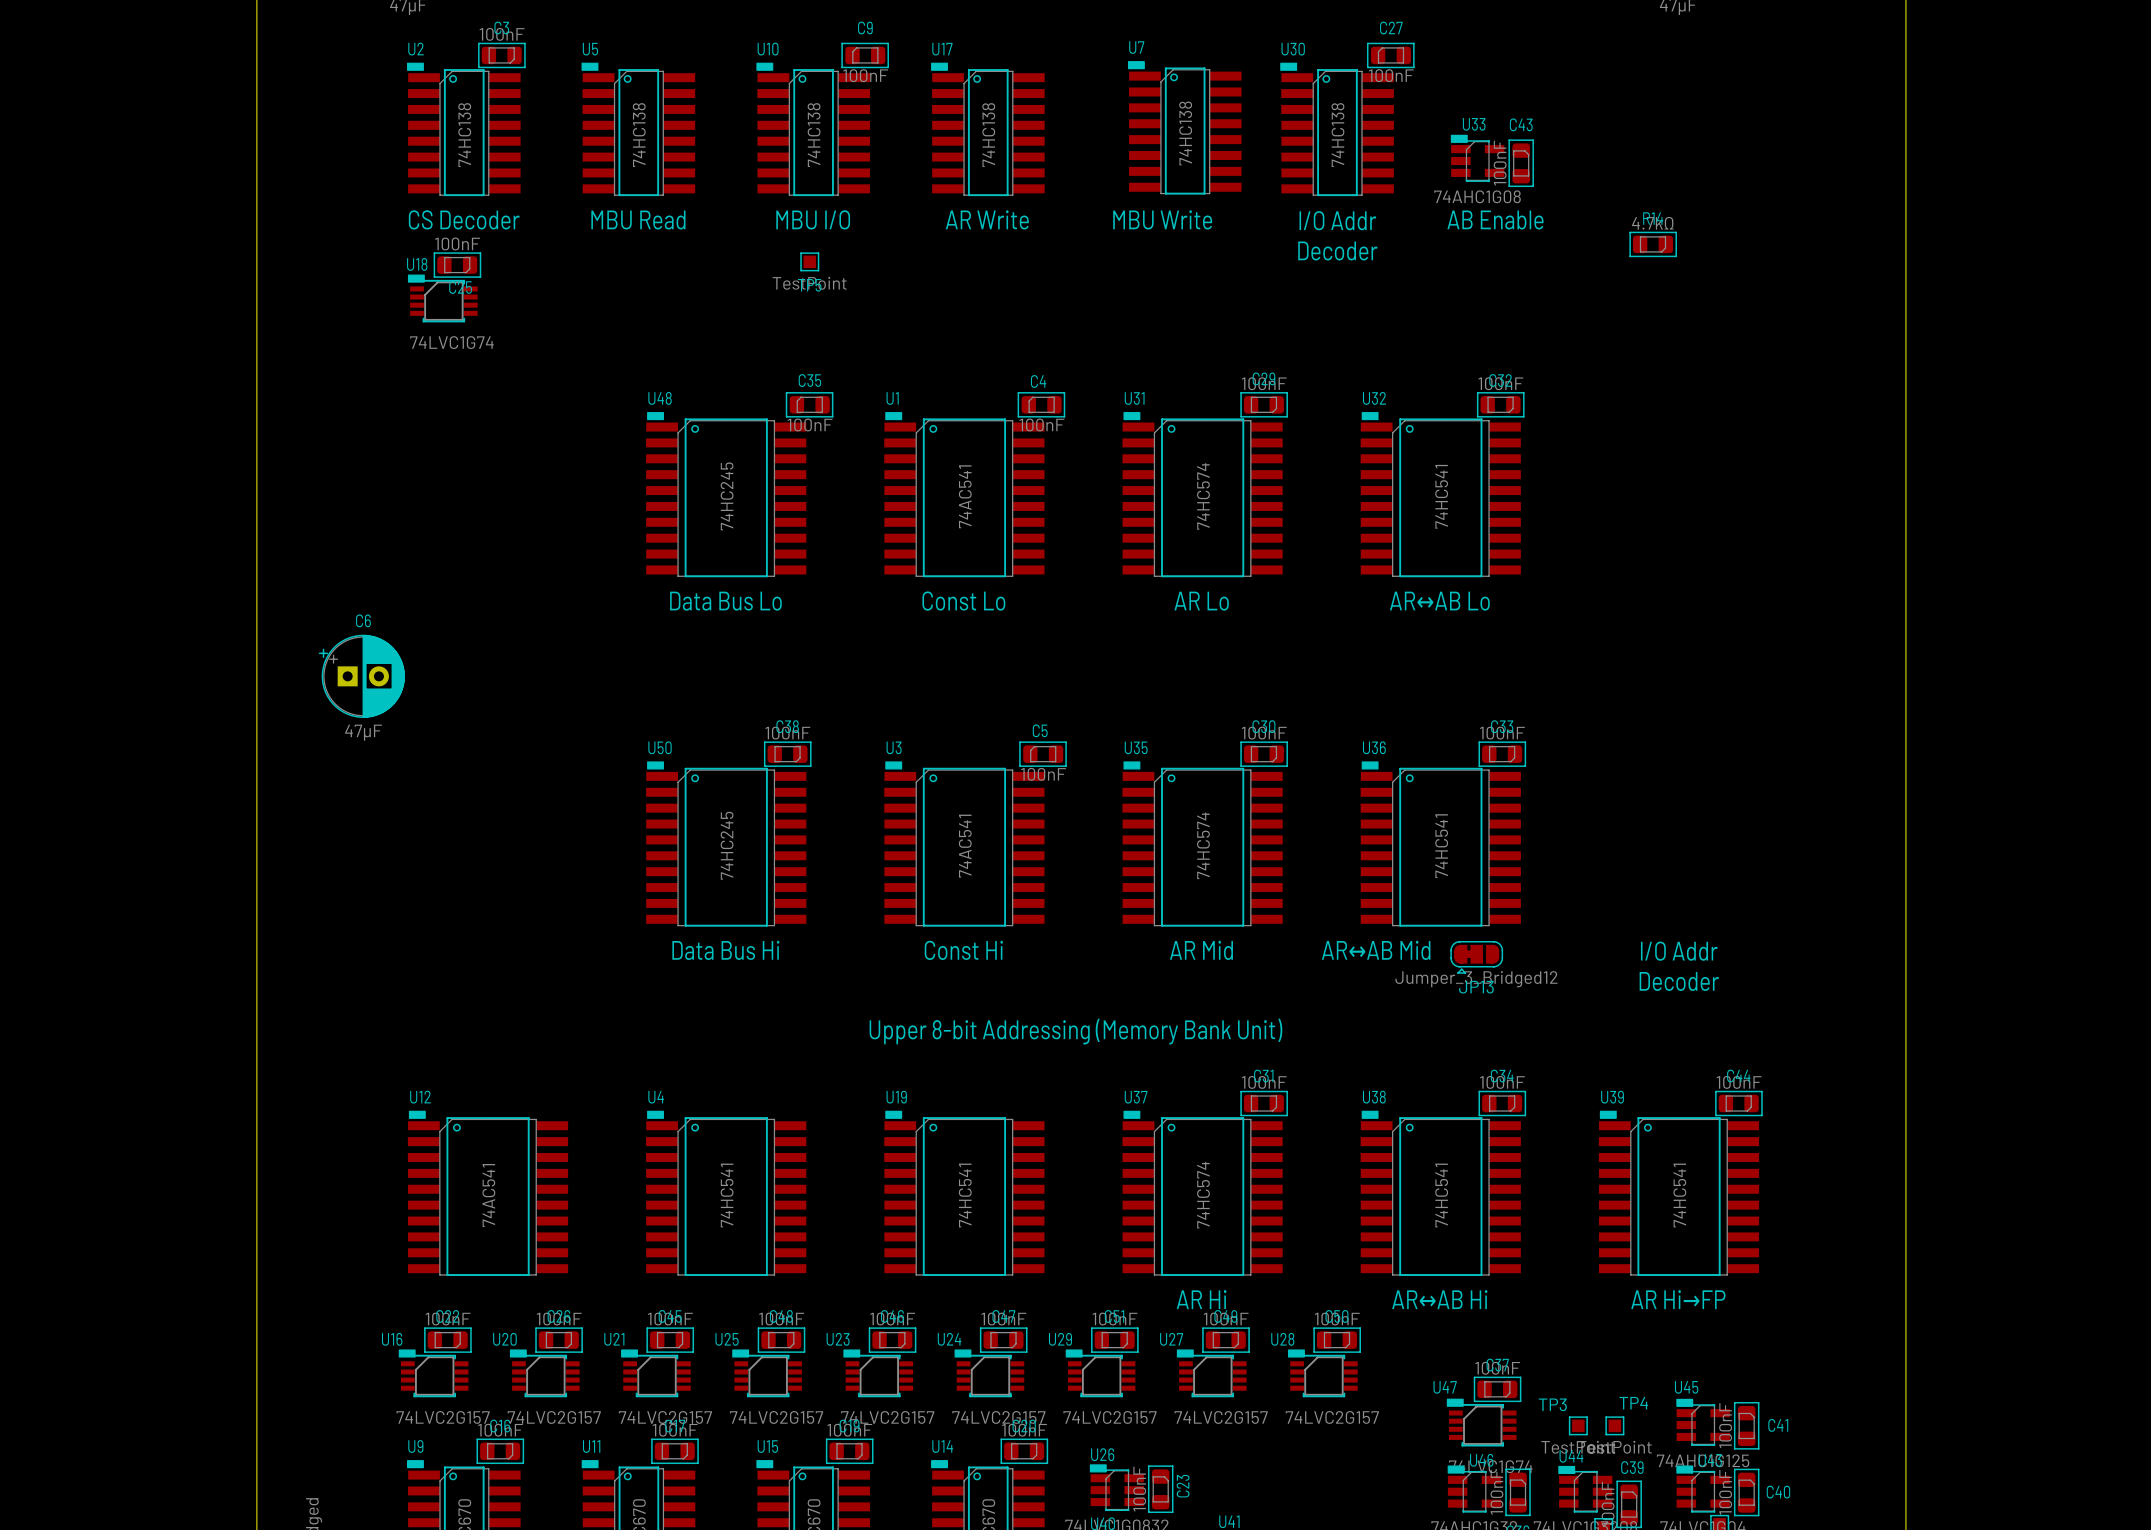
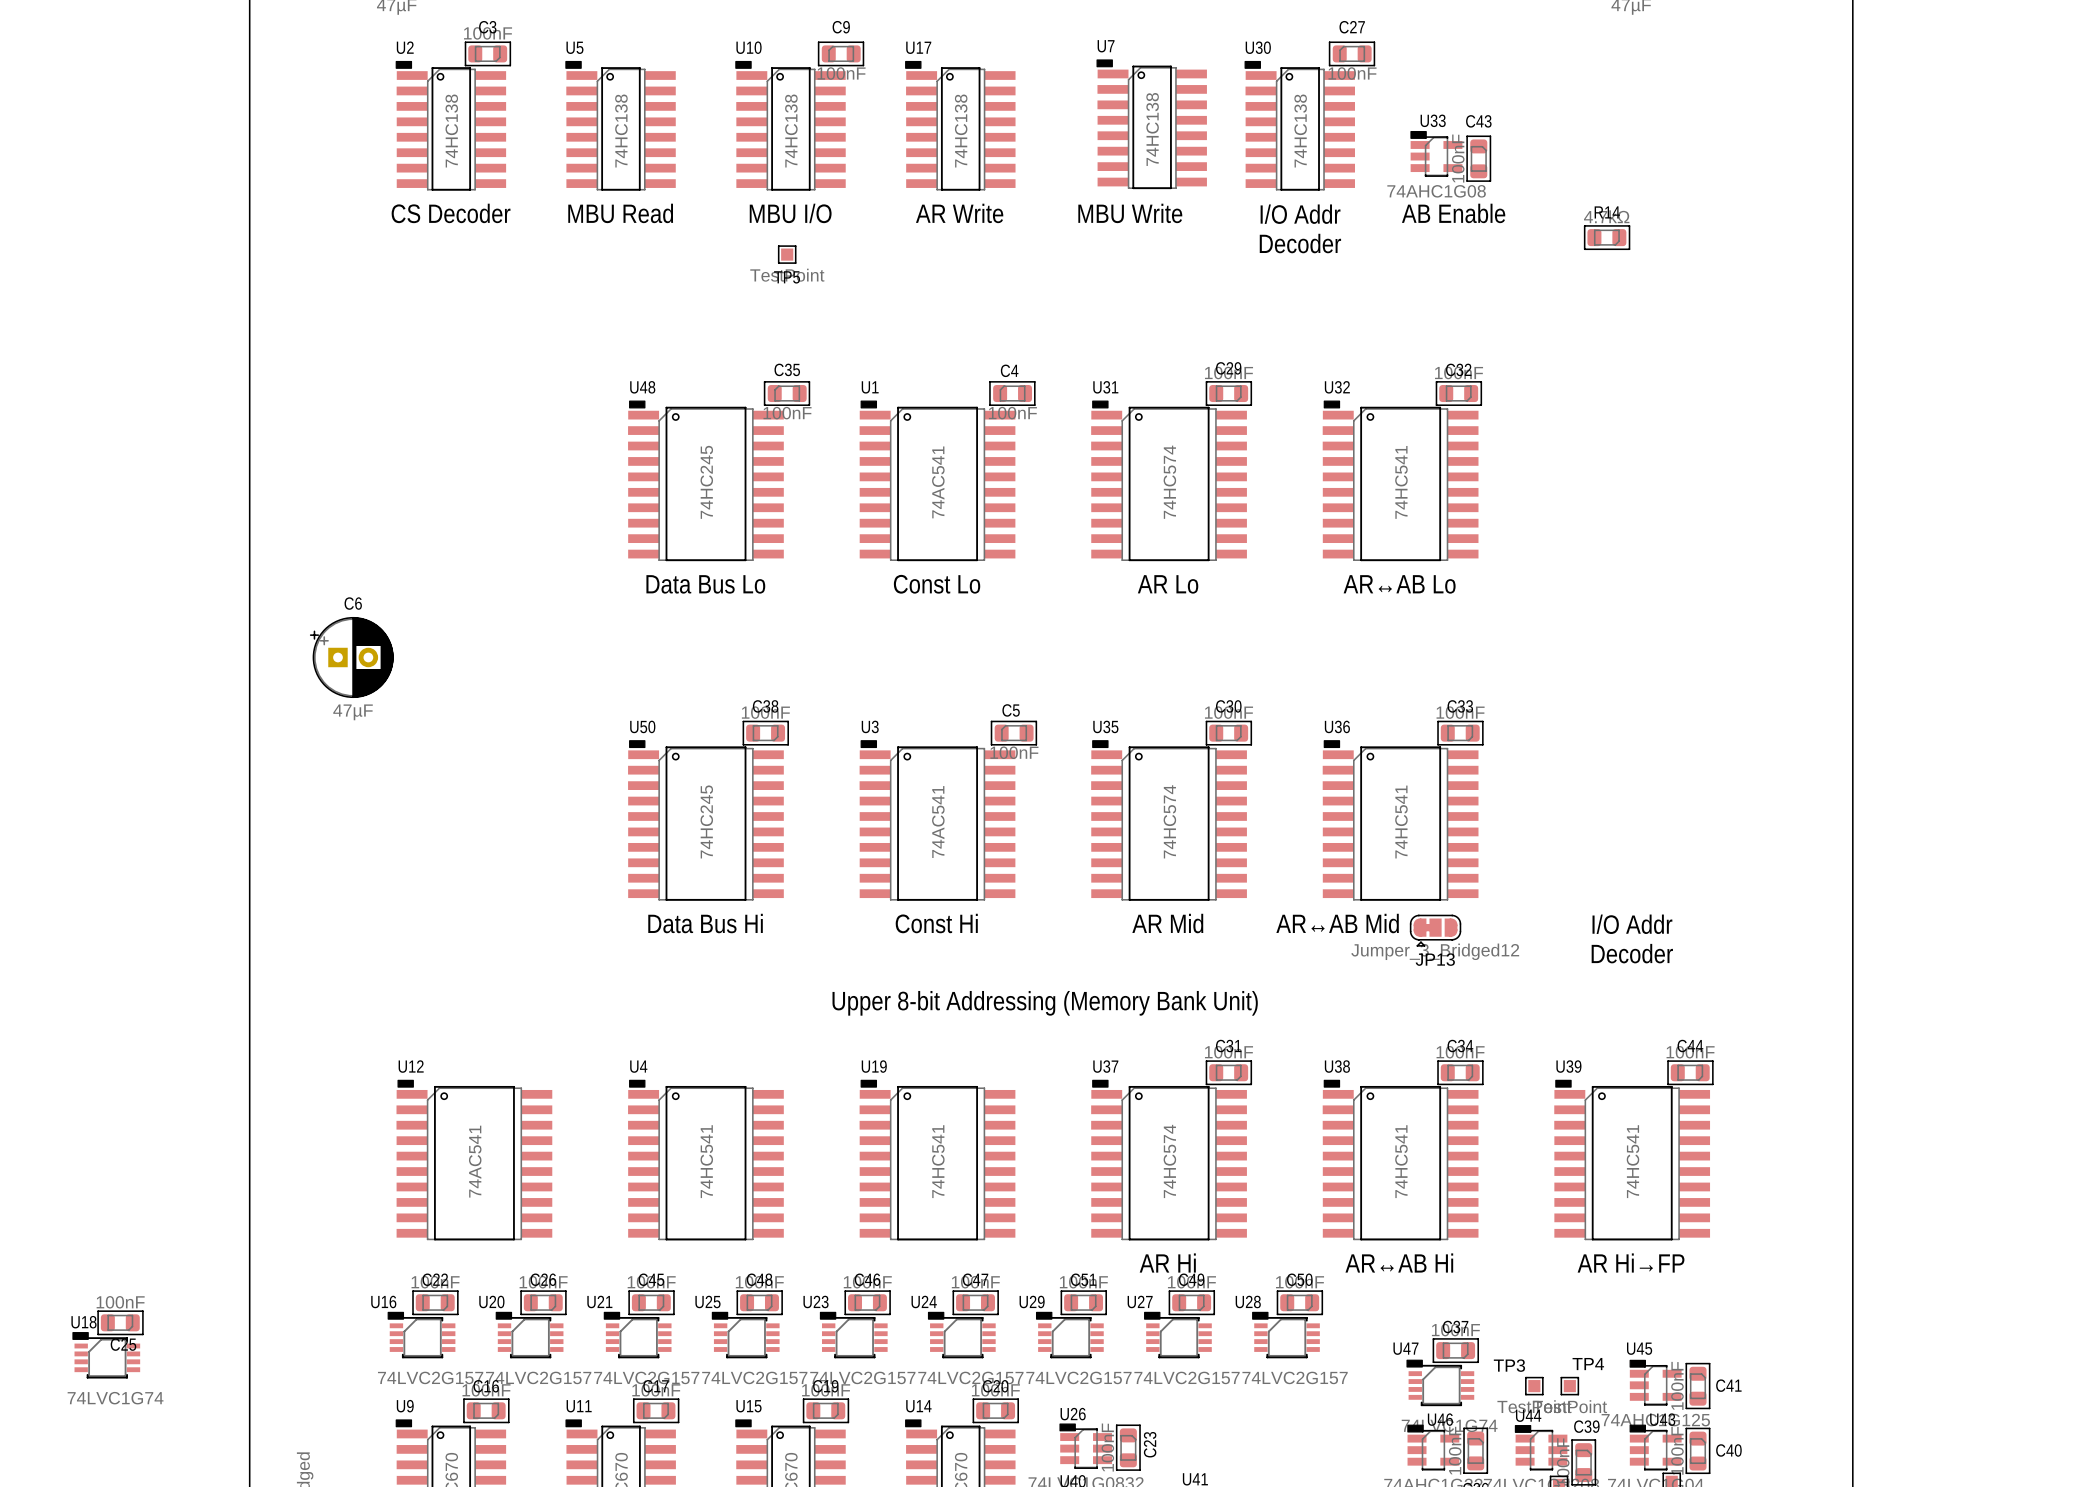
C25 position: (457, 265) -> (120, 1322)
U18 position: (442, 298) -> (106, 1355)

